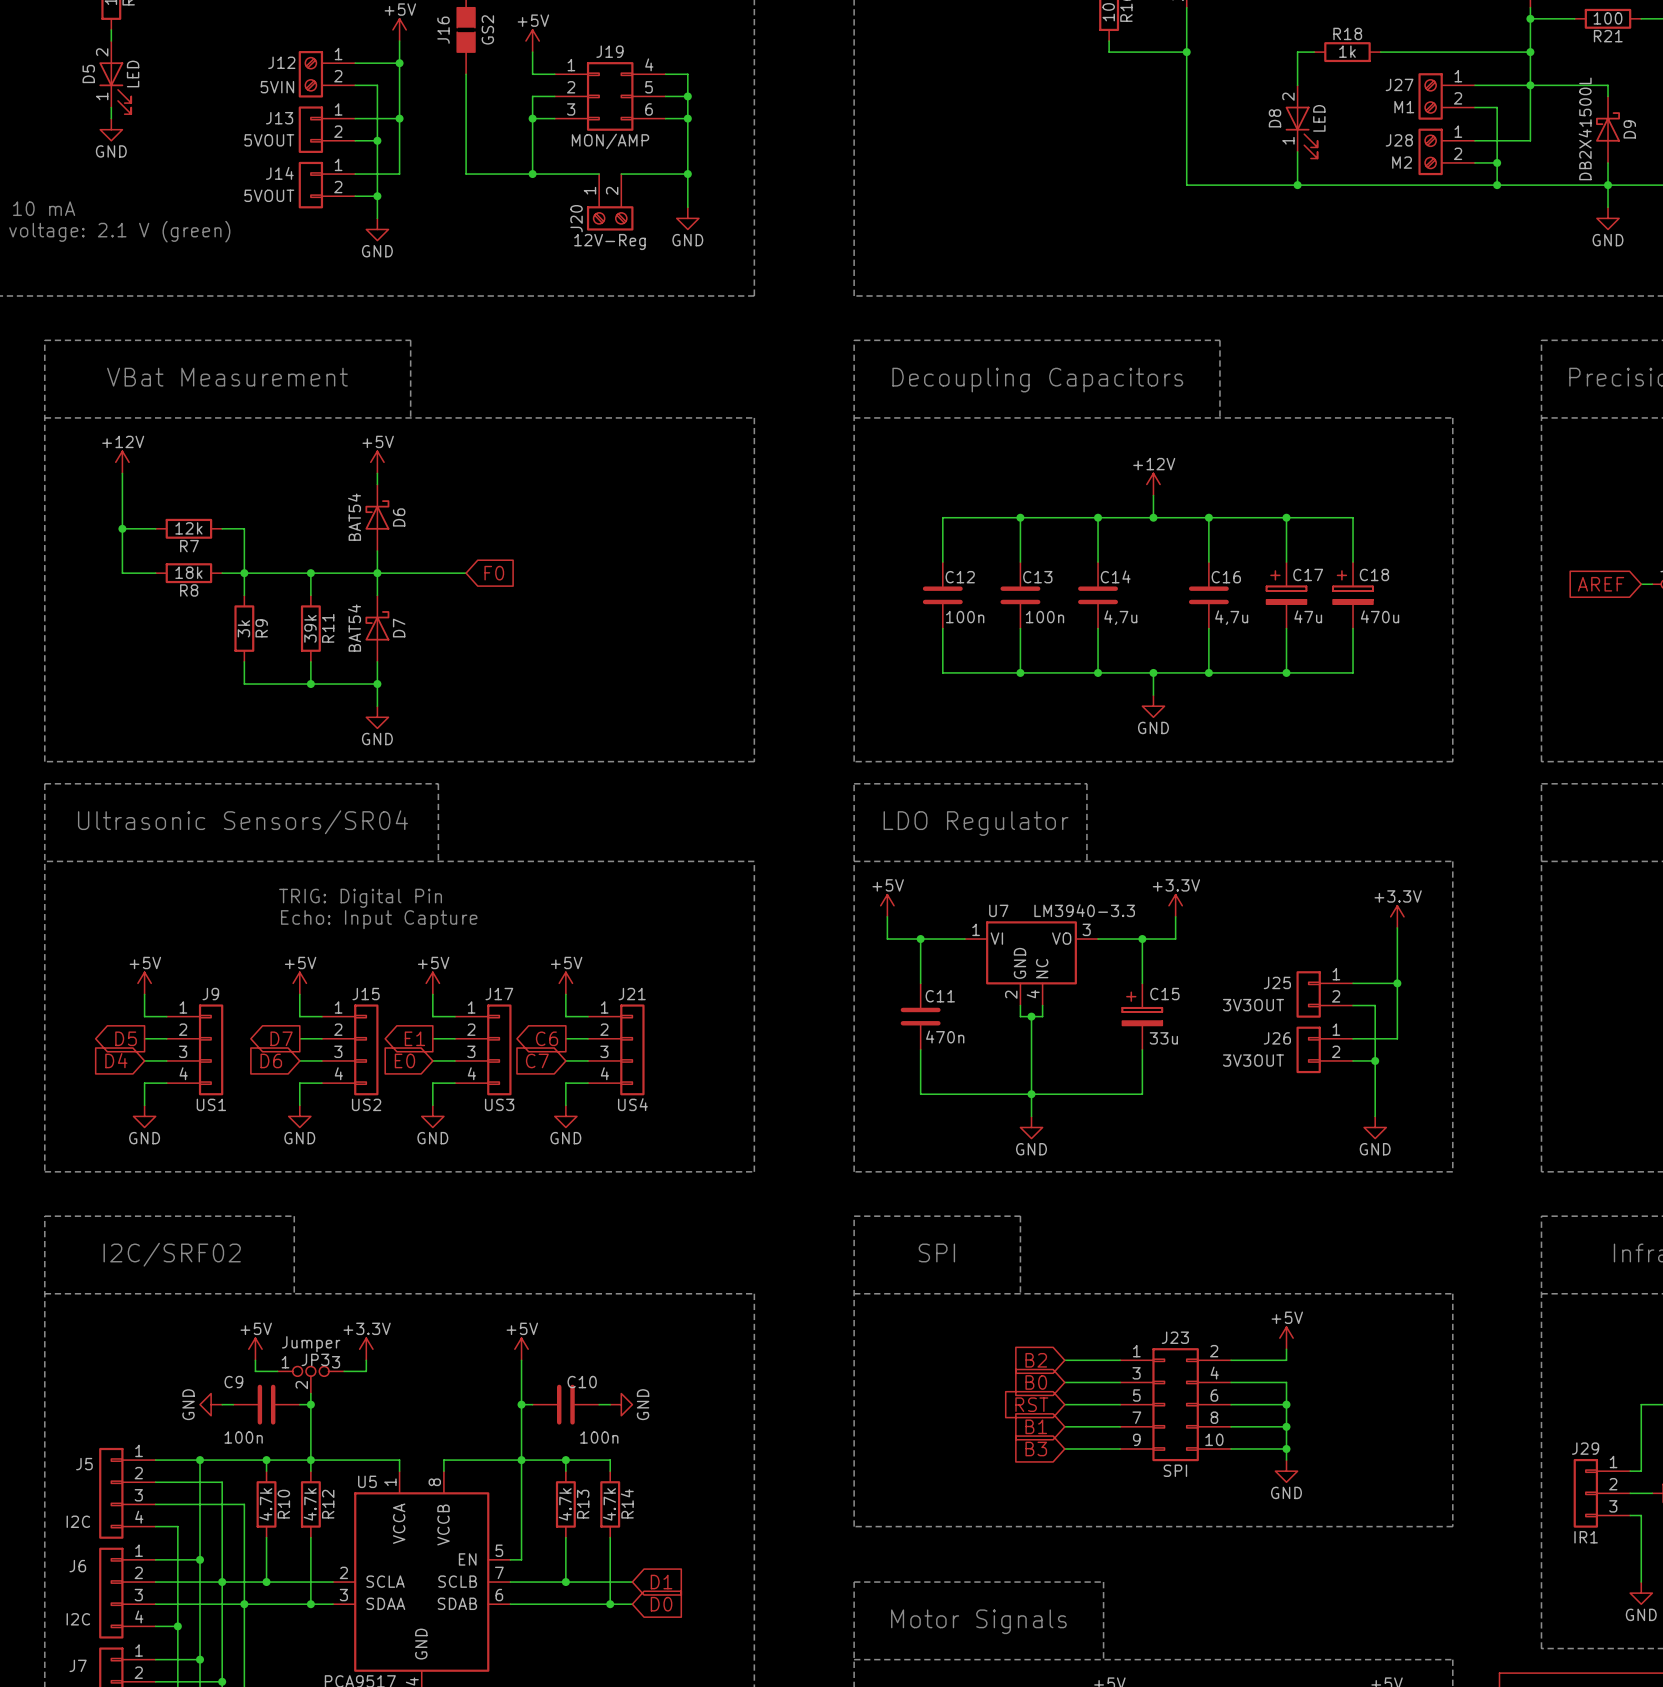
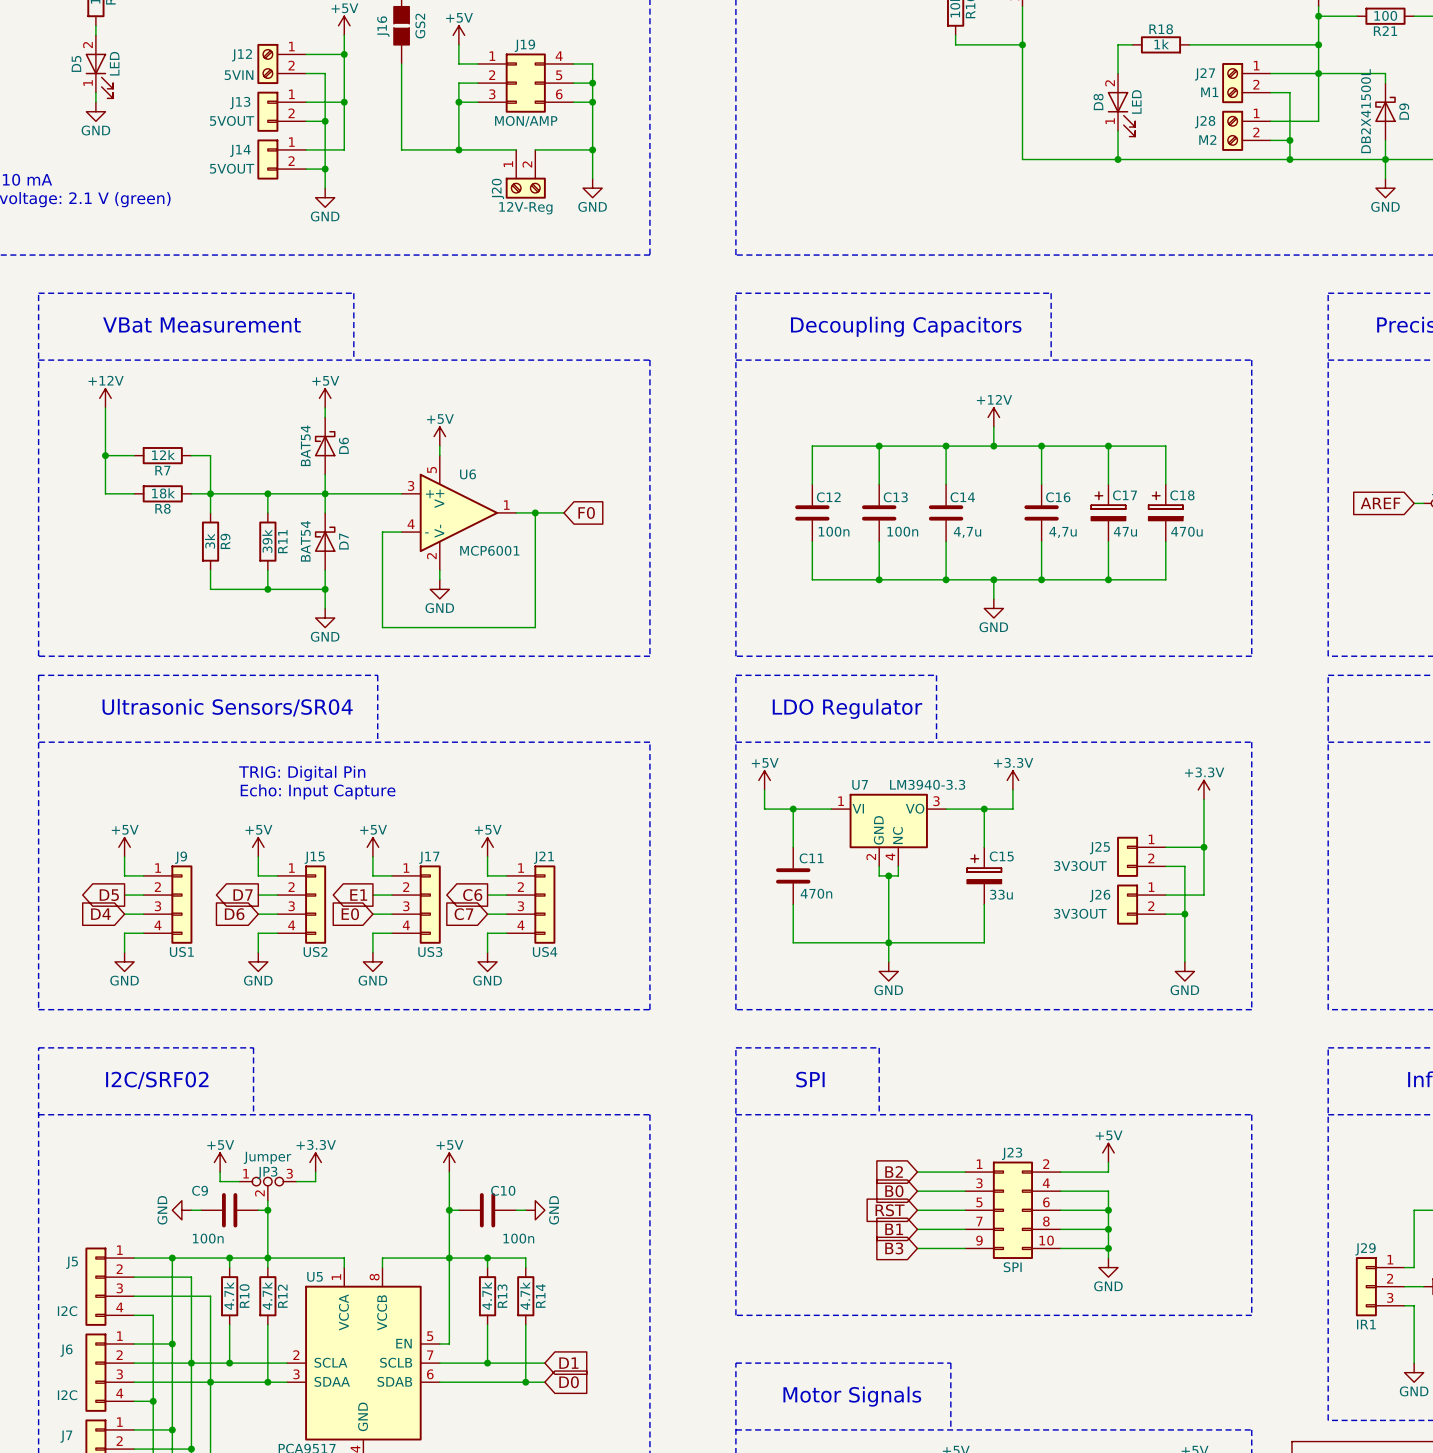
power symbol: none -> +5V (439, 436)
wire: none -> (439, 446) (439, 455)
global label position: F0 (494, 573) -> F0 (586, 512)
U6: none -> MCP6001 (458, 512)
wire: none -> (516, 512) (563, 512)
wire: none -> (535, 512) (535, 627) (382, 627) (382, 532) (401, 532)
junction: none -> (535, 512)
wire: none -> (439, 570) (439, 579)
power symbol: none -> GND (439, 589)

